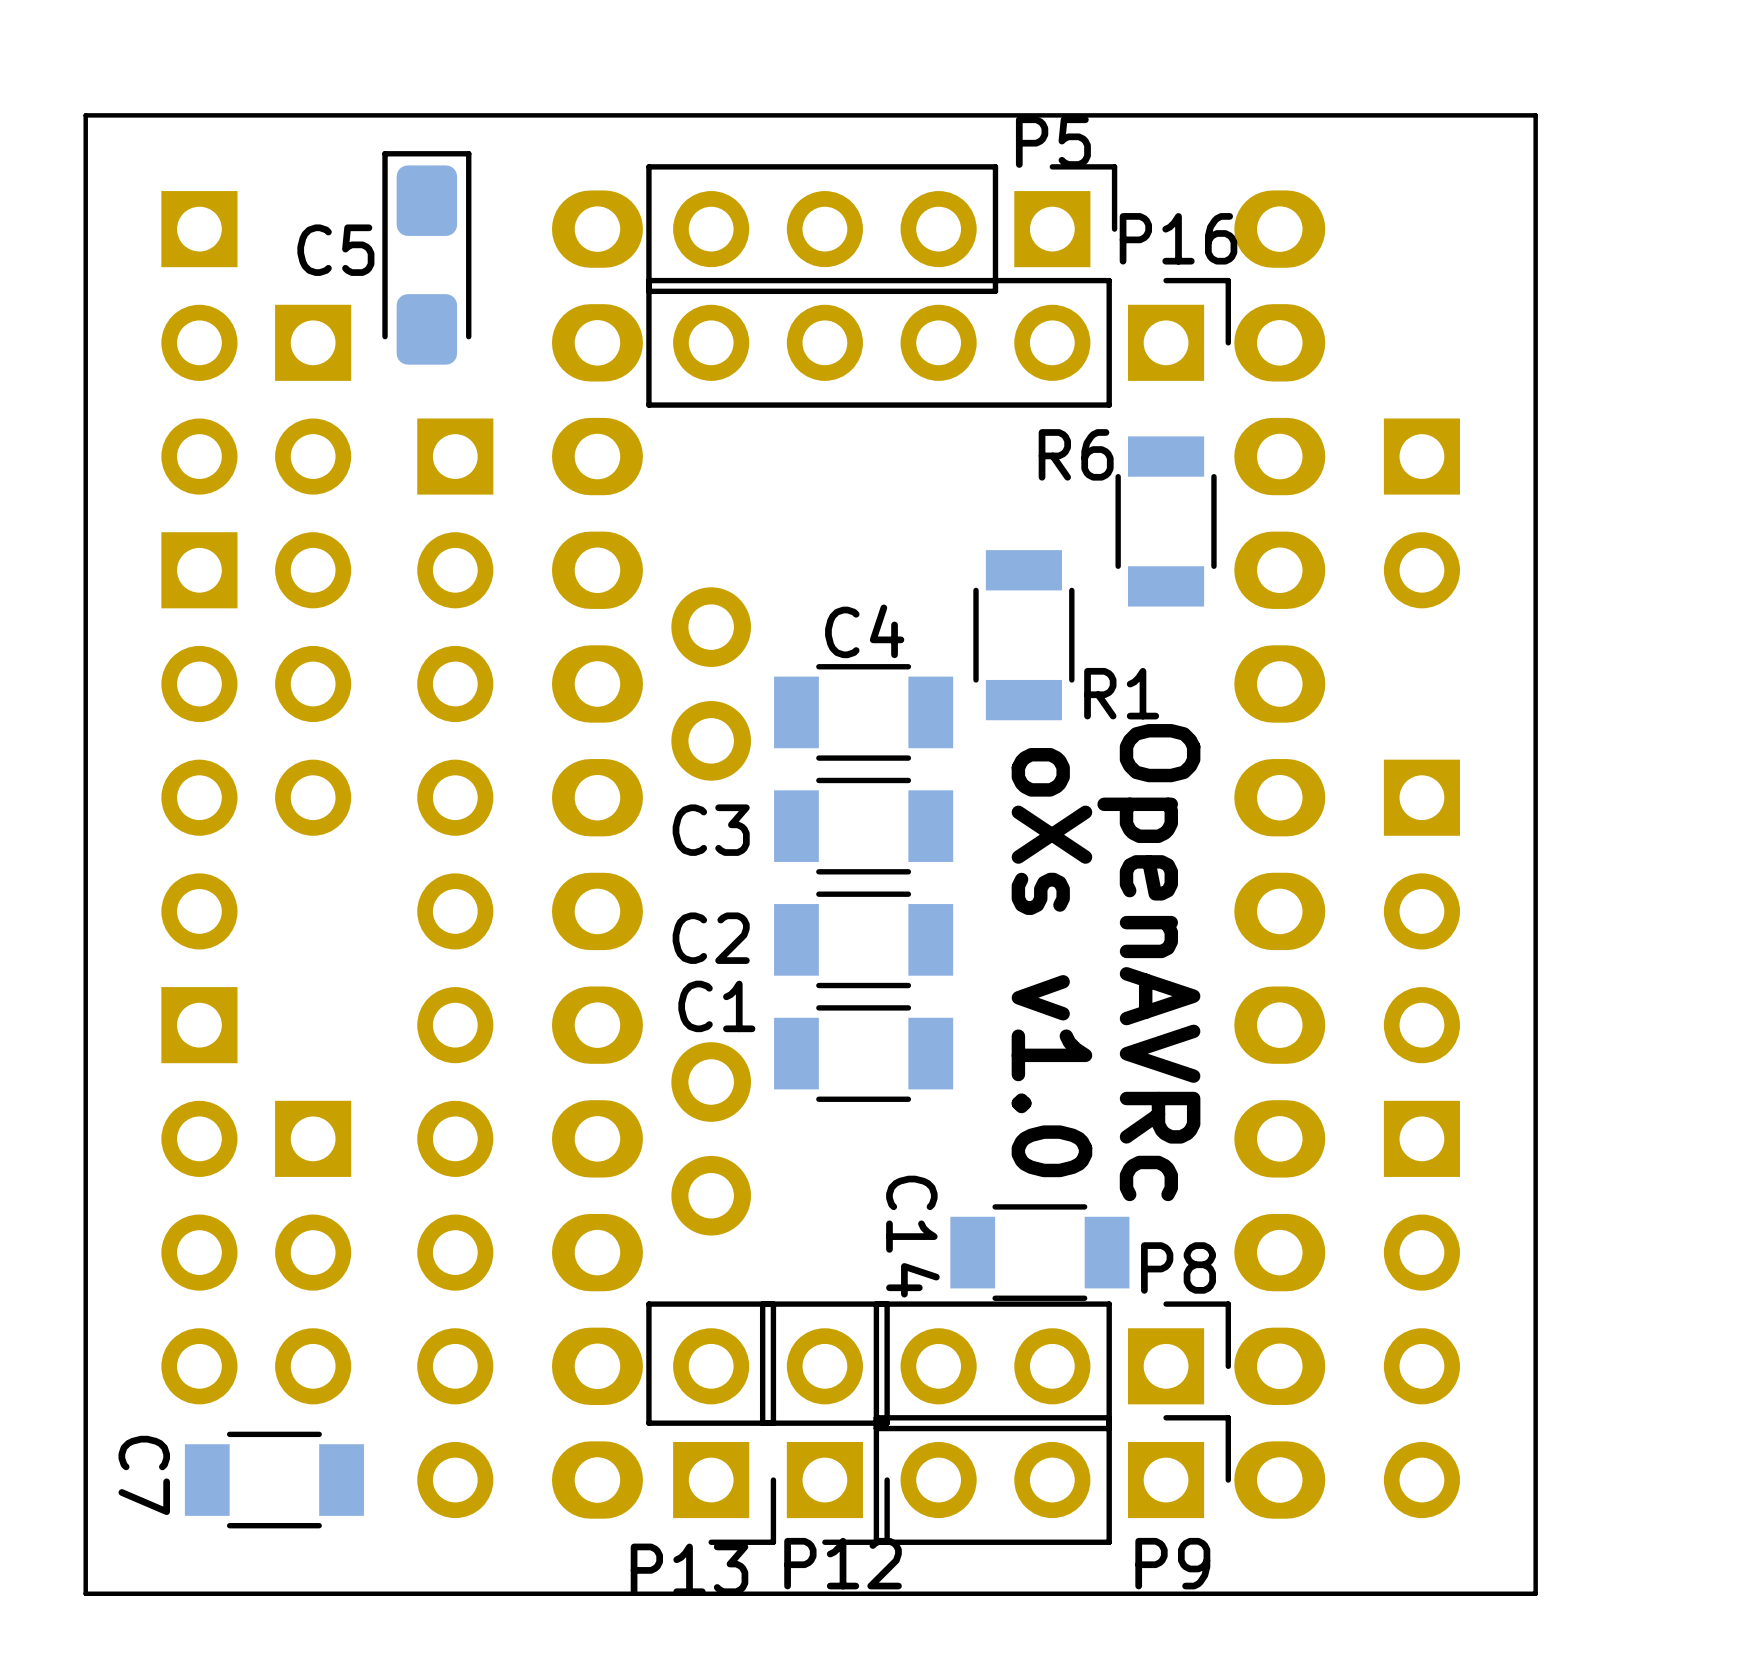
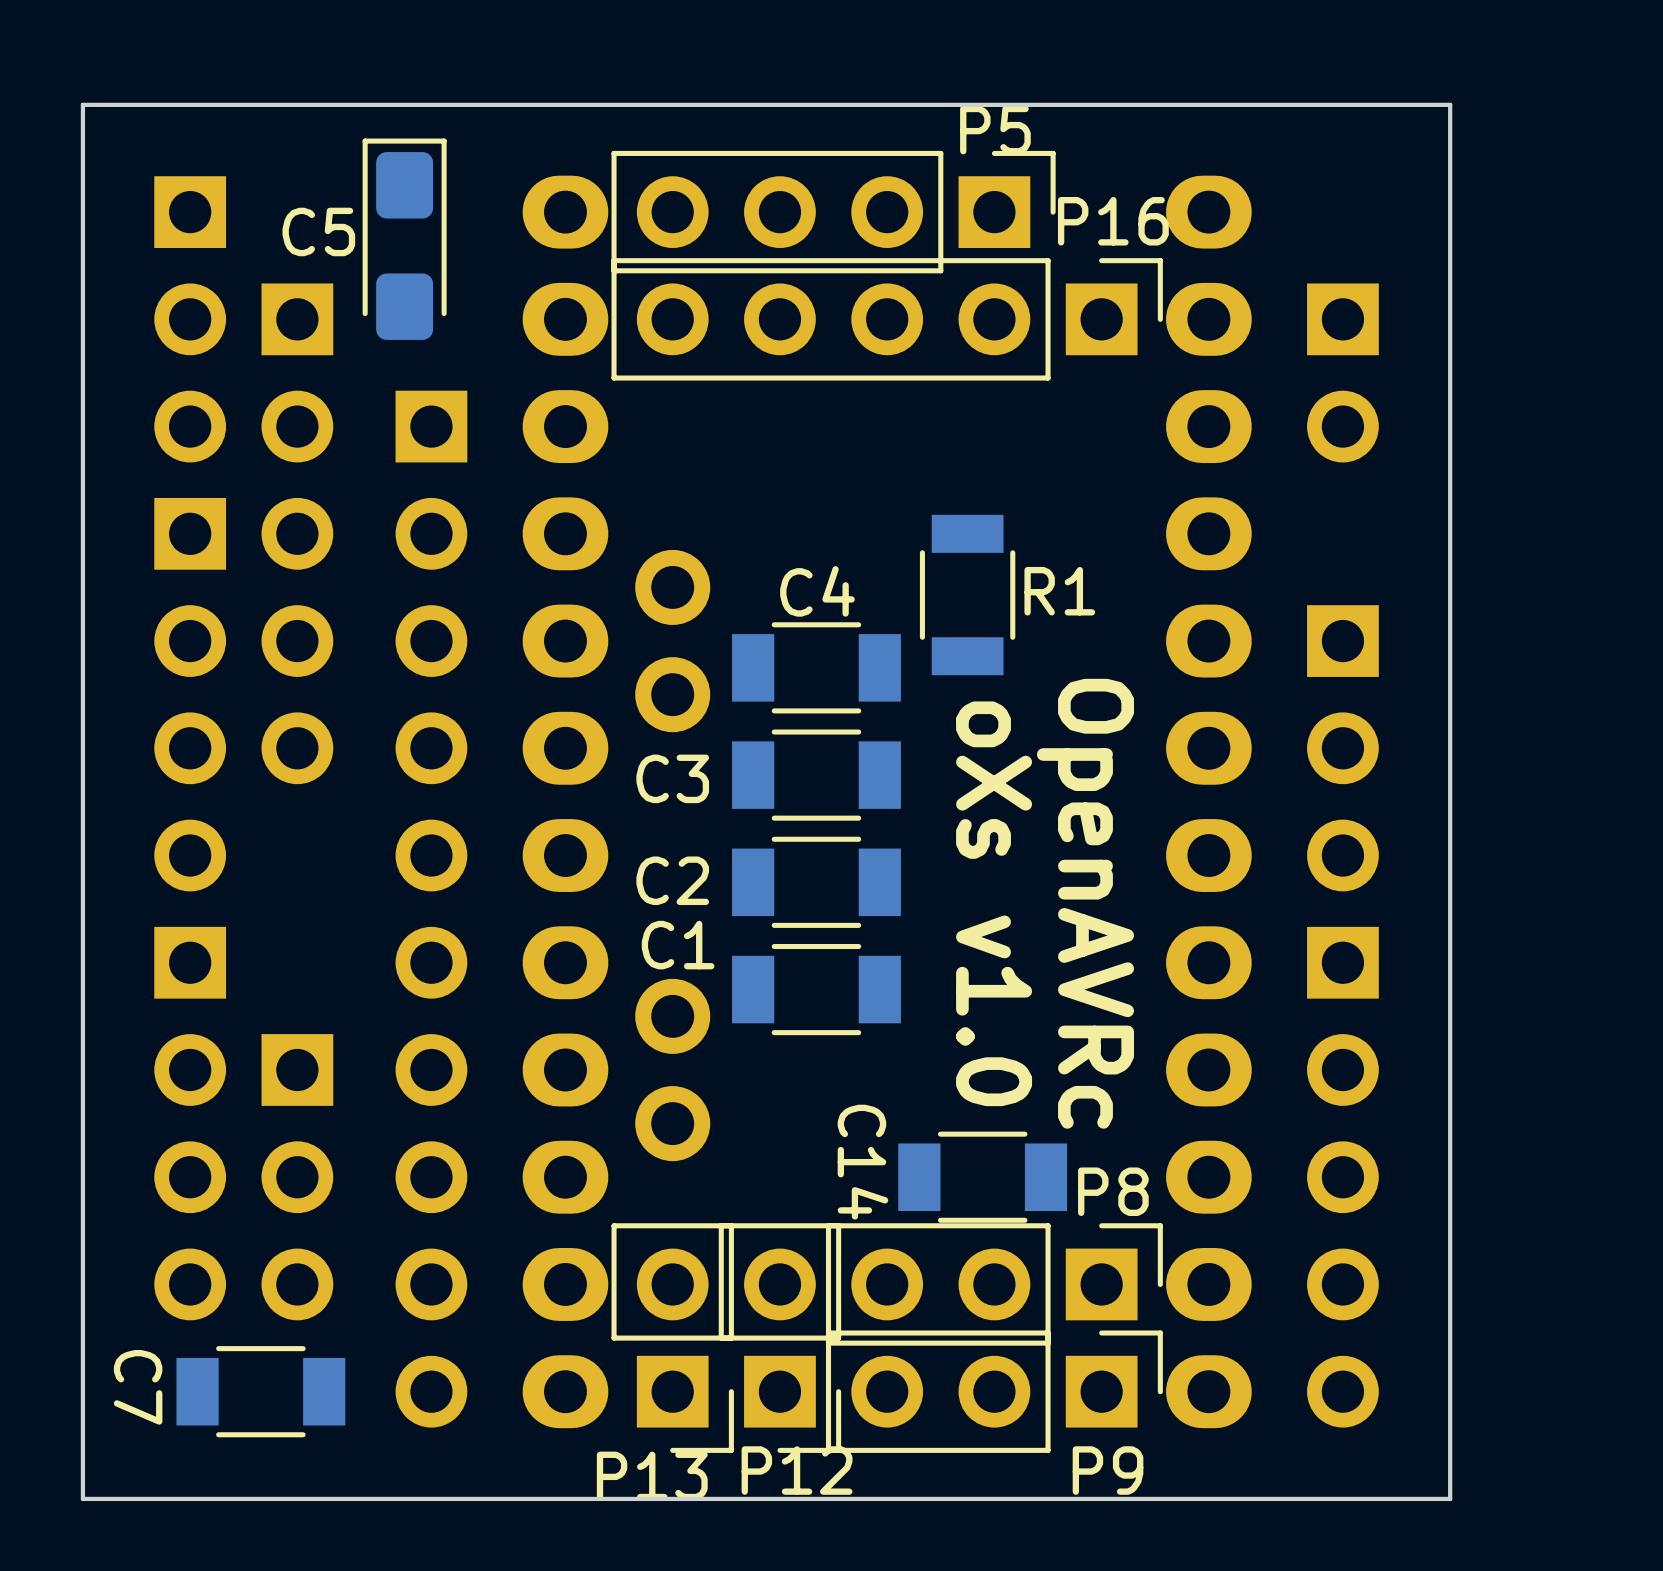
part position: (1421, 513) -> (1342, 372)
R6: (1166, 521) -> none
R1 name position: R1 (1121, 693) -> R1 (1059, 591)
part position: (1421, 911) -> (1342, 748)
part: none -> (1342, 1177)
part: (1421, 1309) -> none

